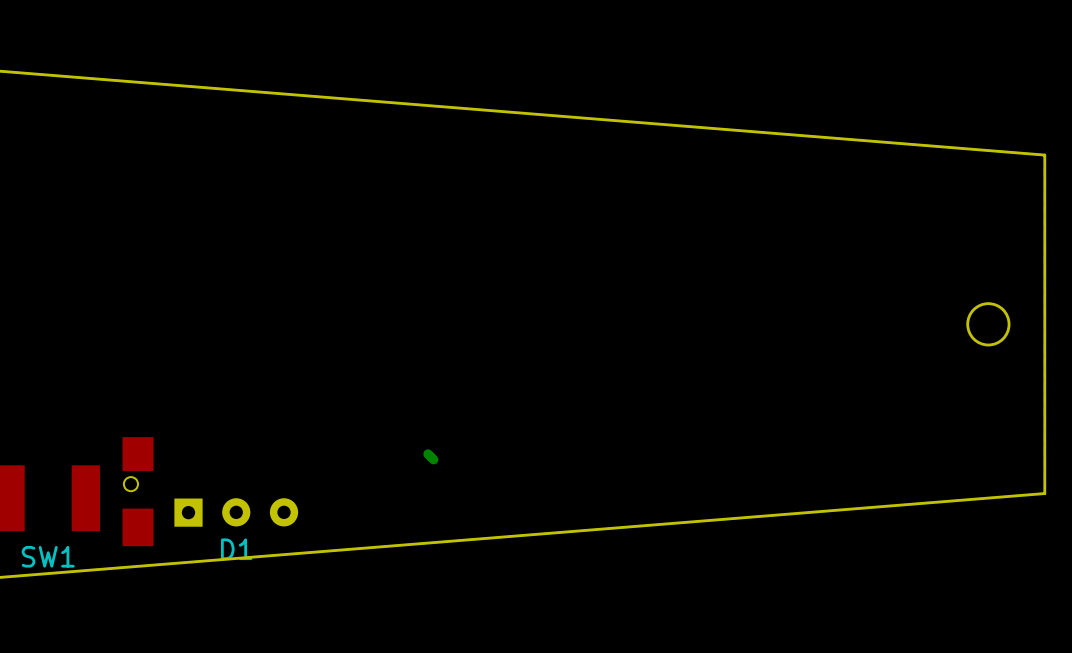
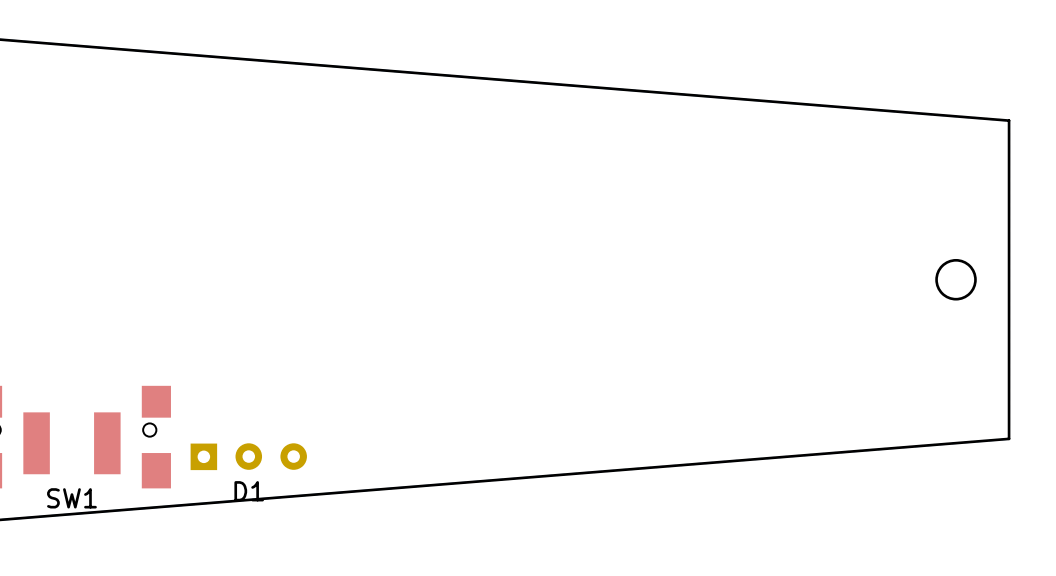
bottom track: (428, 454) (433, 459) -> none

